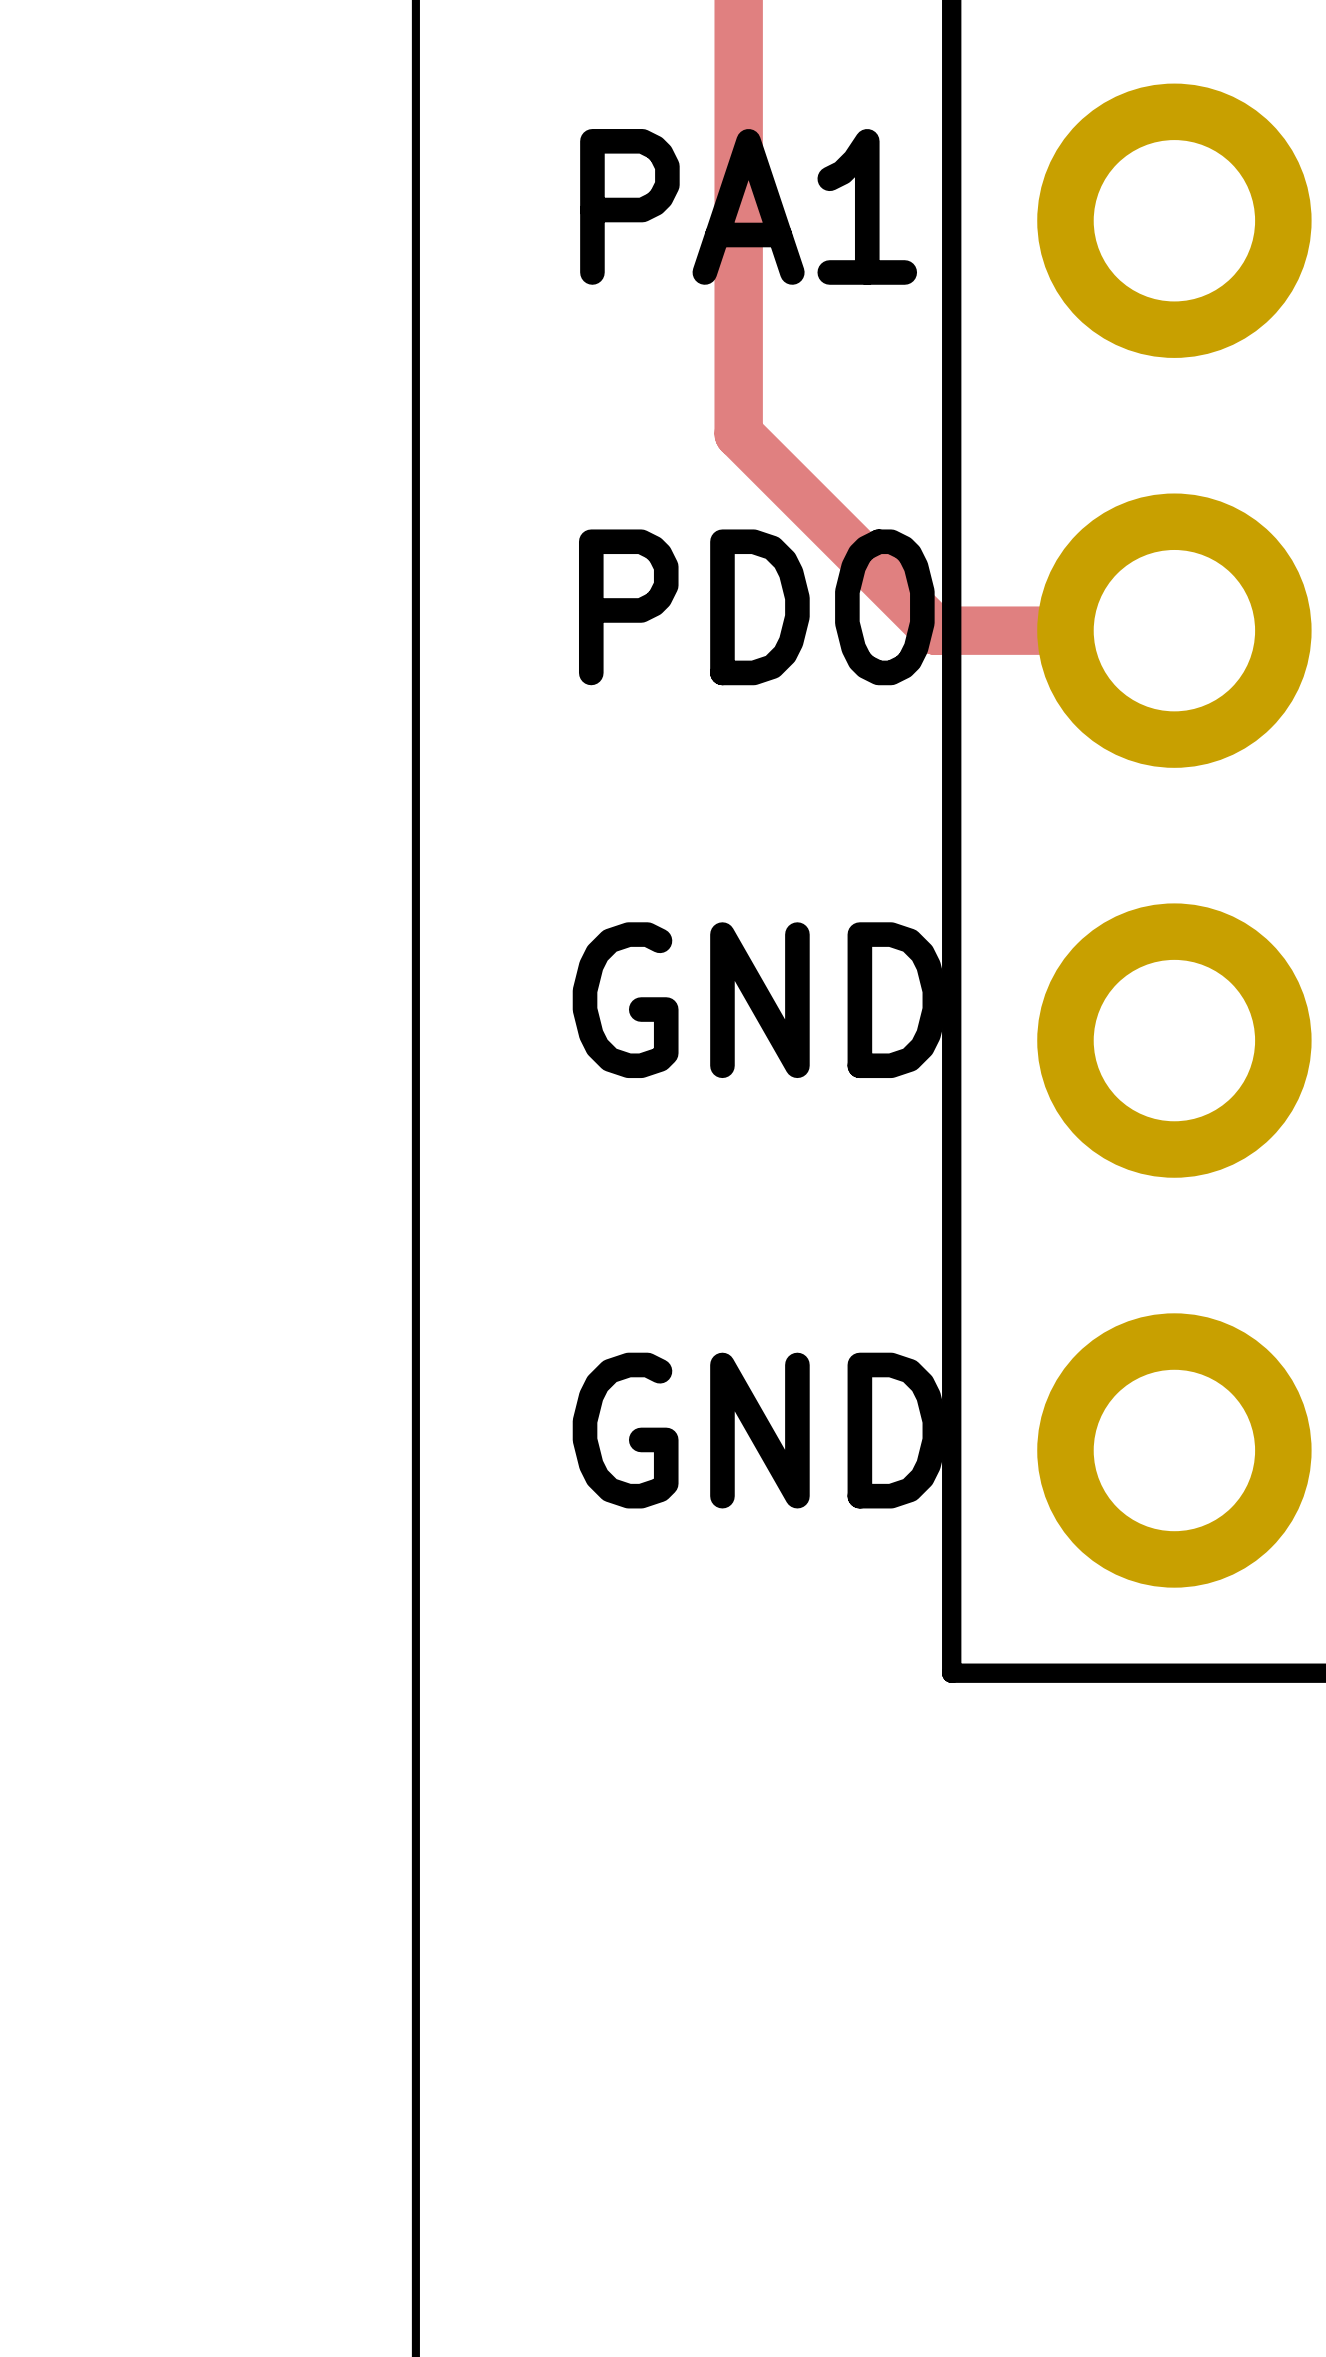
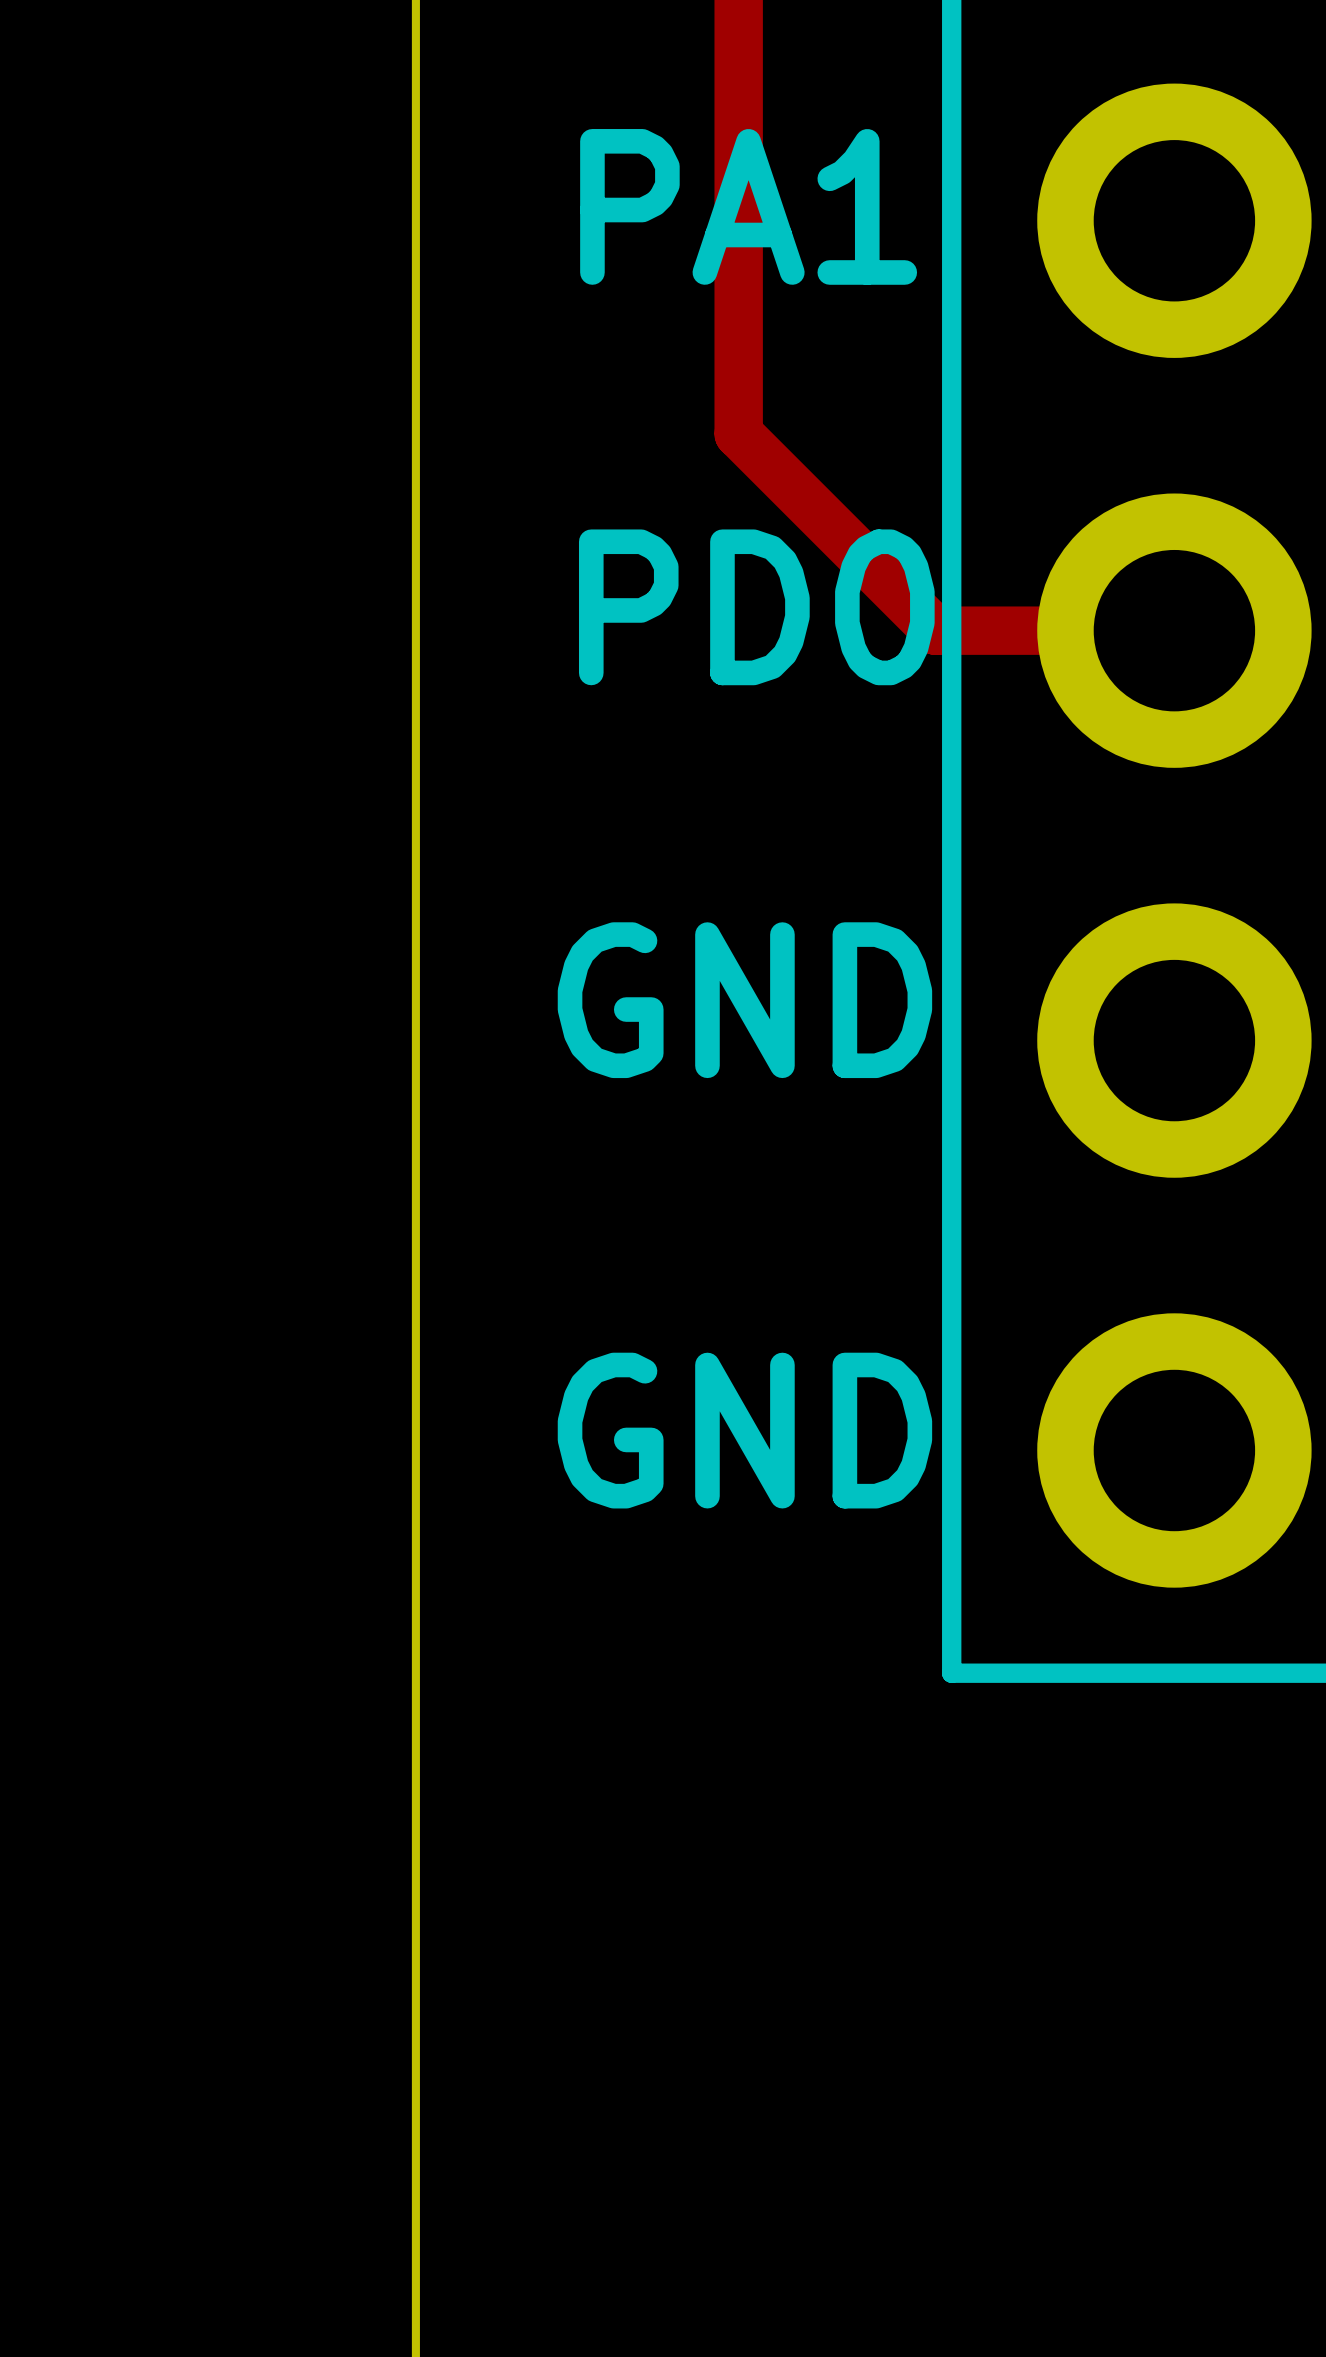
text position: GND (759, 1000) -> GND (744, 1000)
text position: GND (759, 1430) -> GND (744, 1430)

